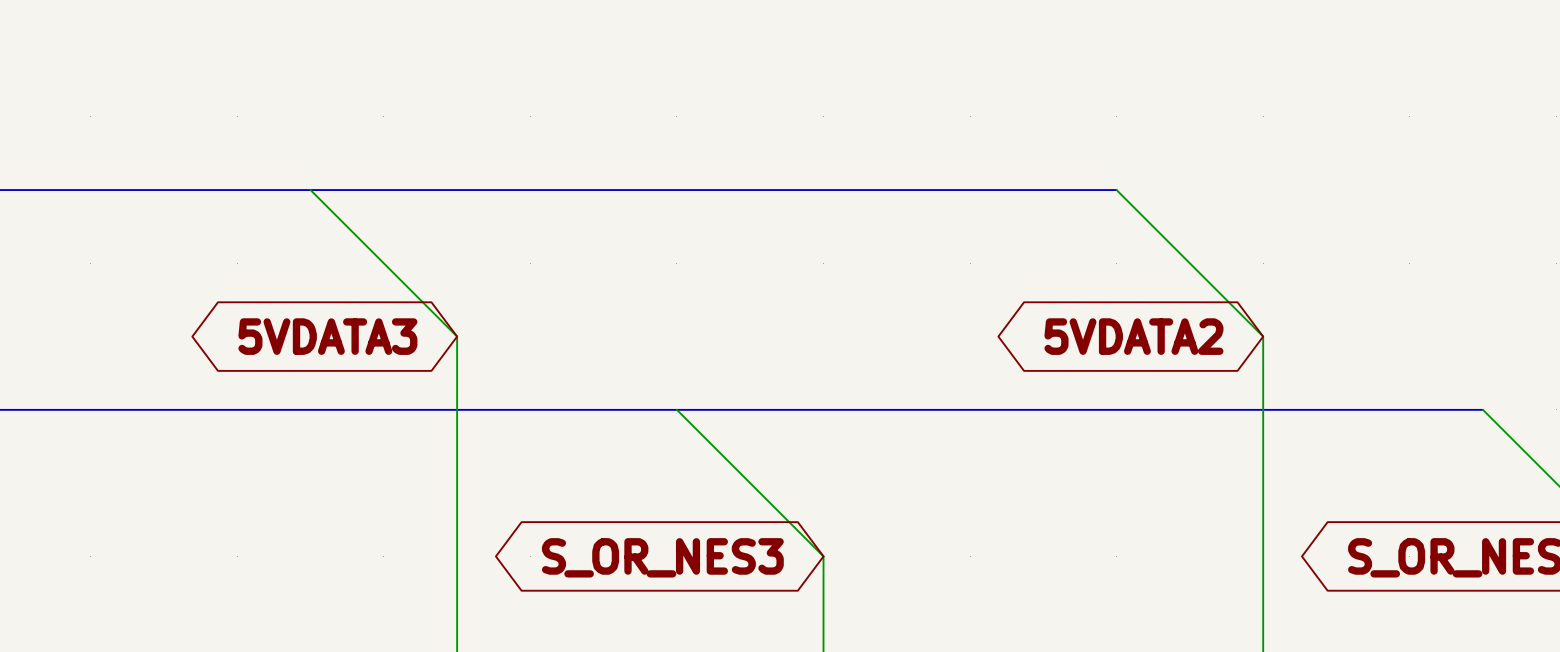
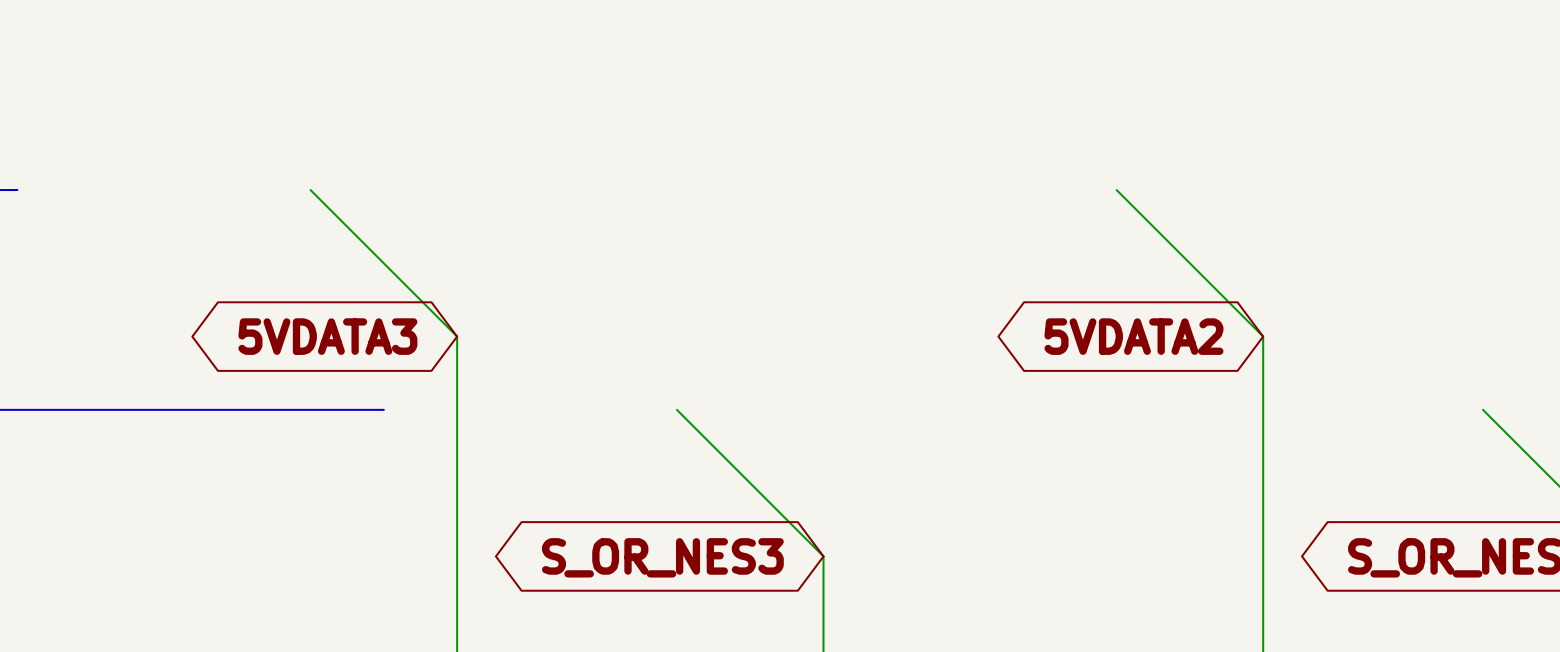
bus: (17, 190) (1116, 190) -> none
bus: (383, 409) (1483, 409) -> none

